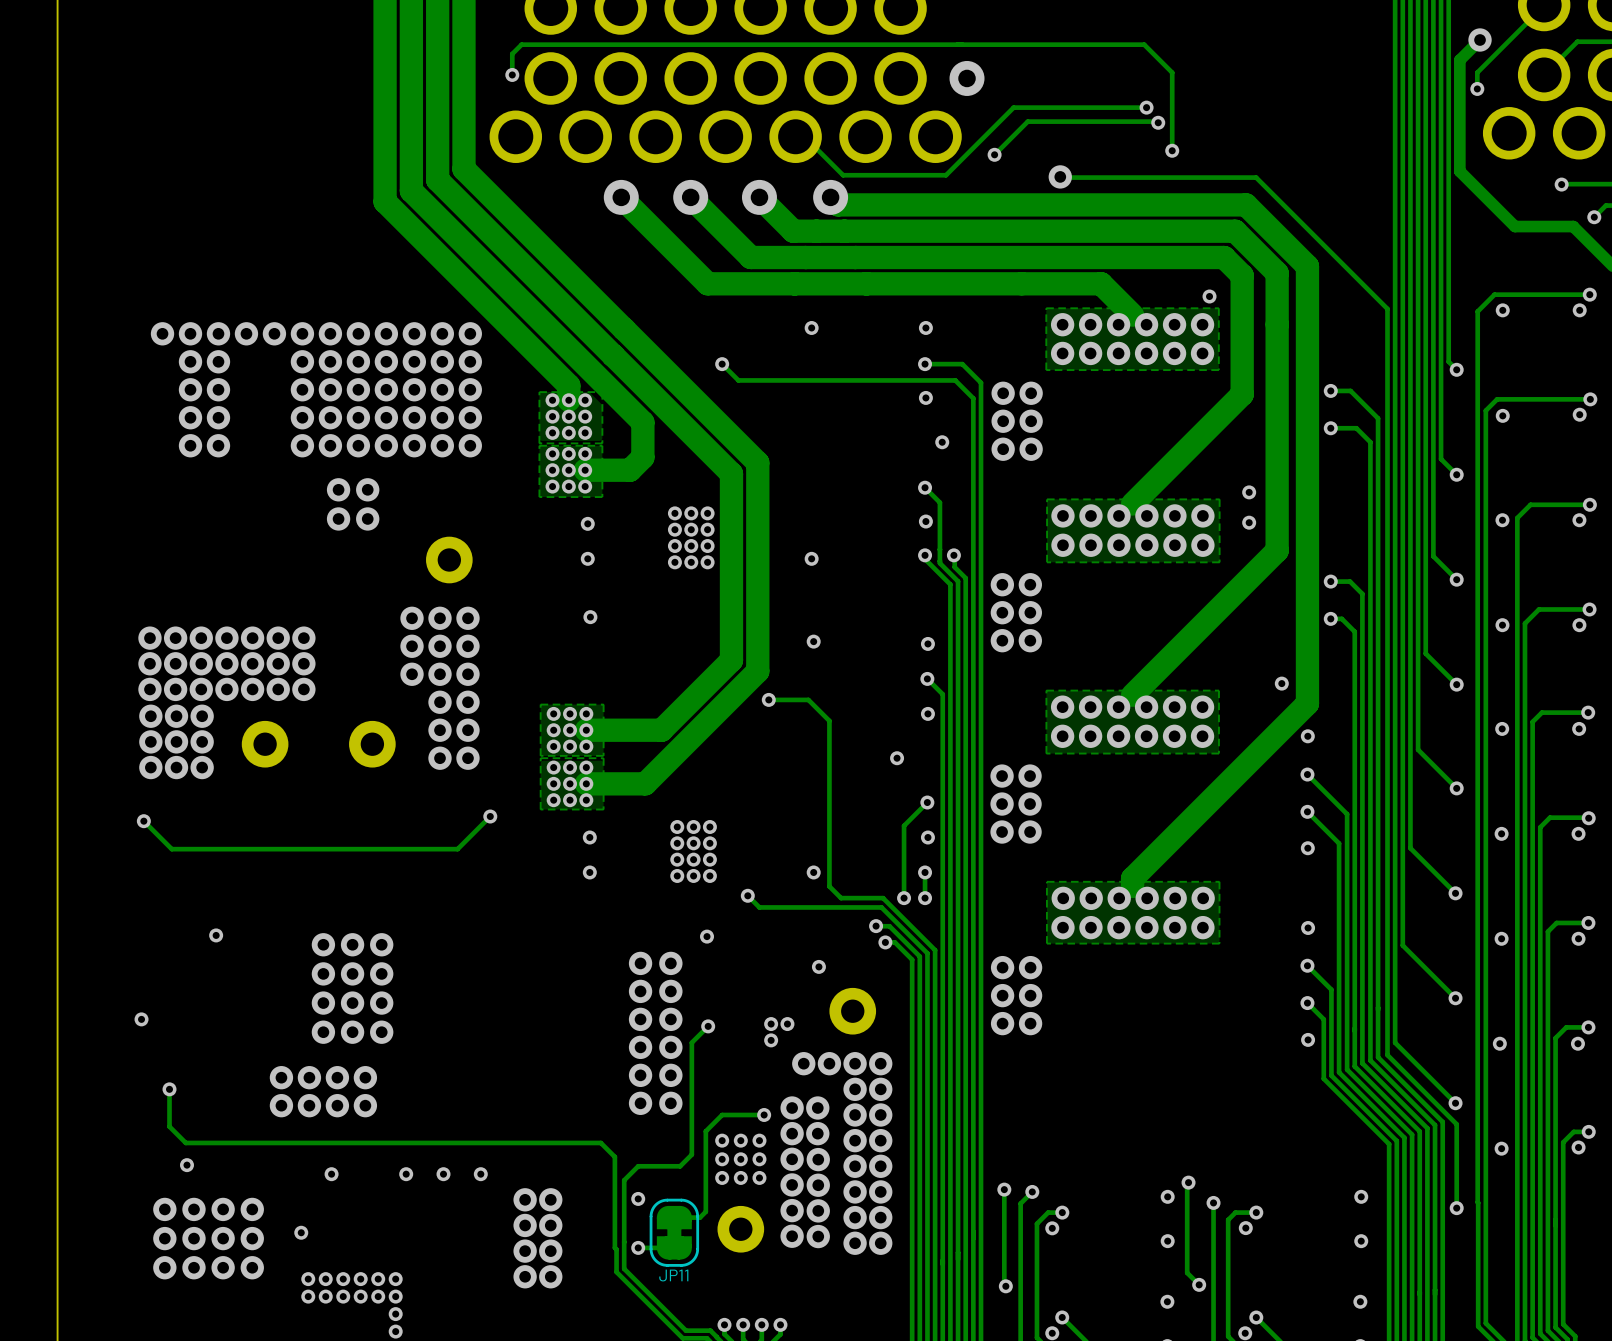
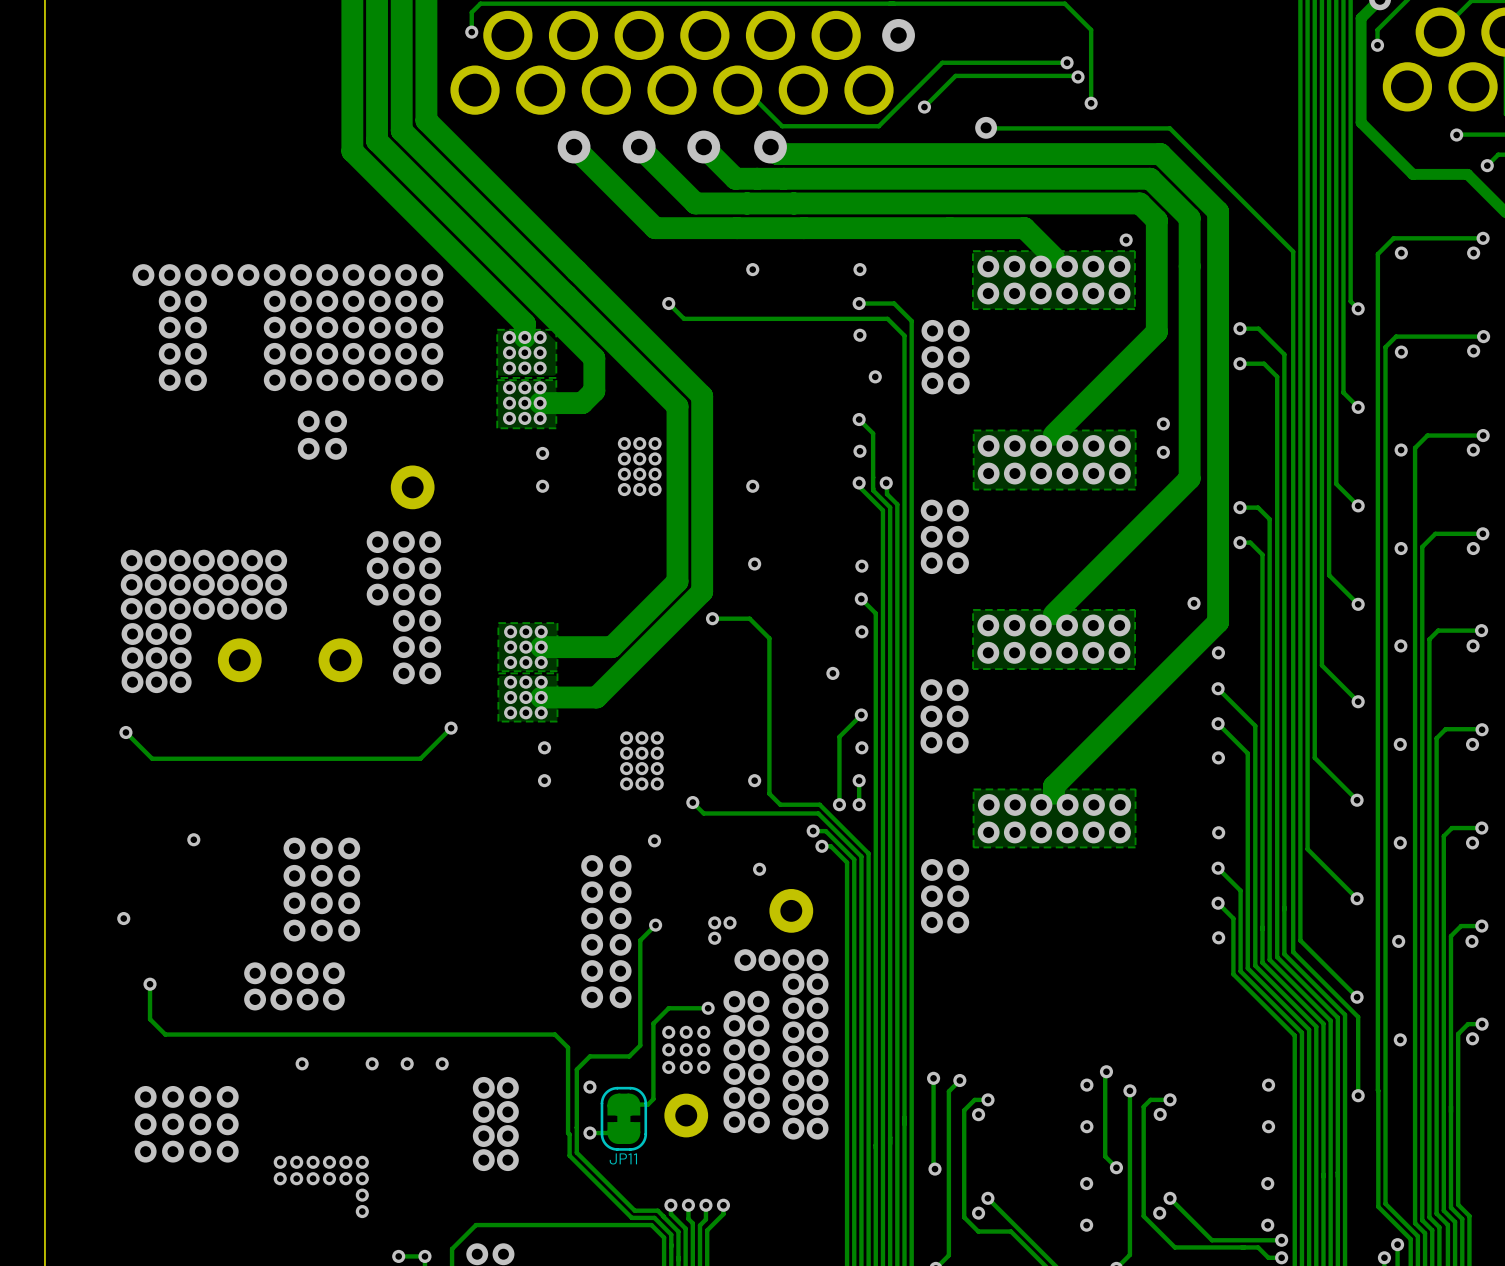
via: (590, 617) -> none
via: (186, 1165) -> none
via: (301, 1232) -> none

